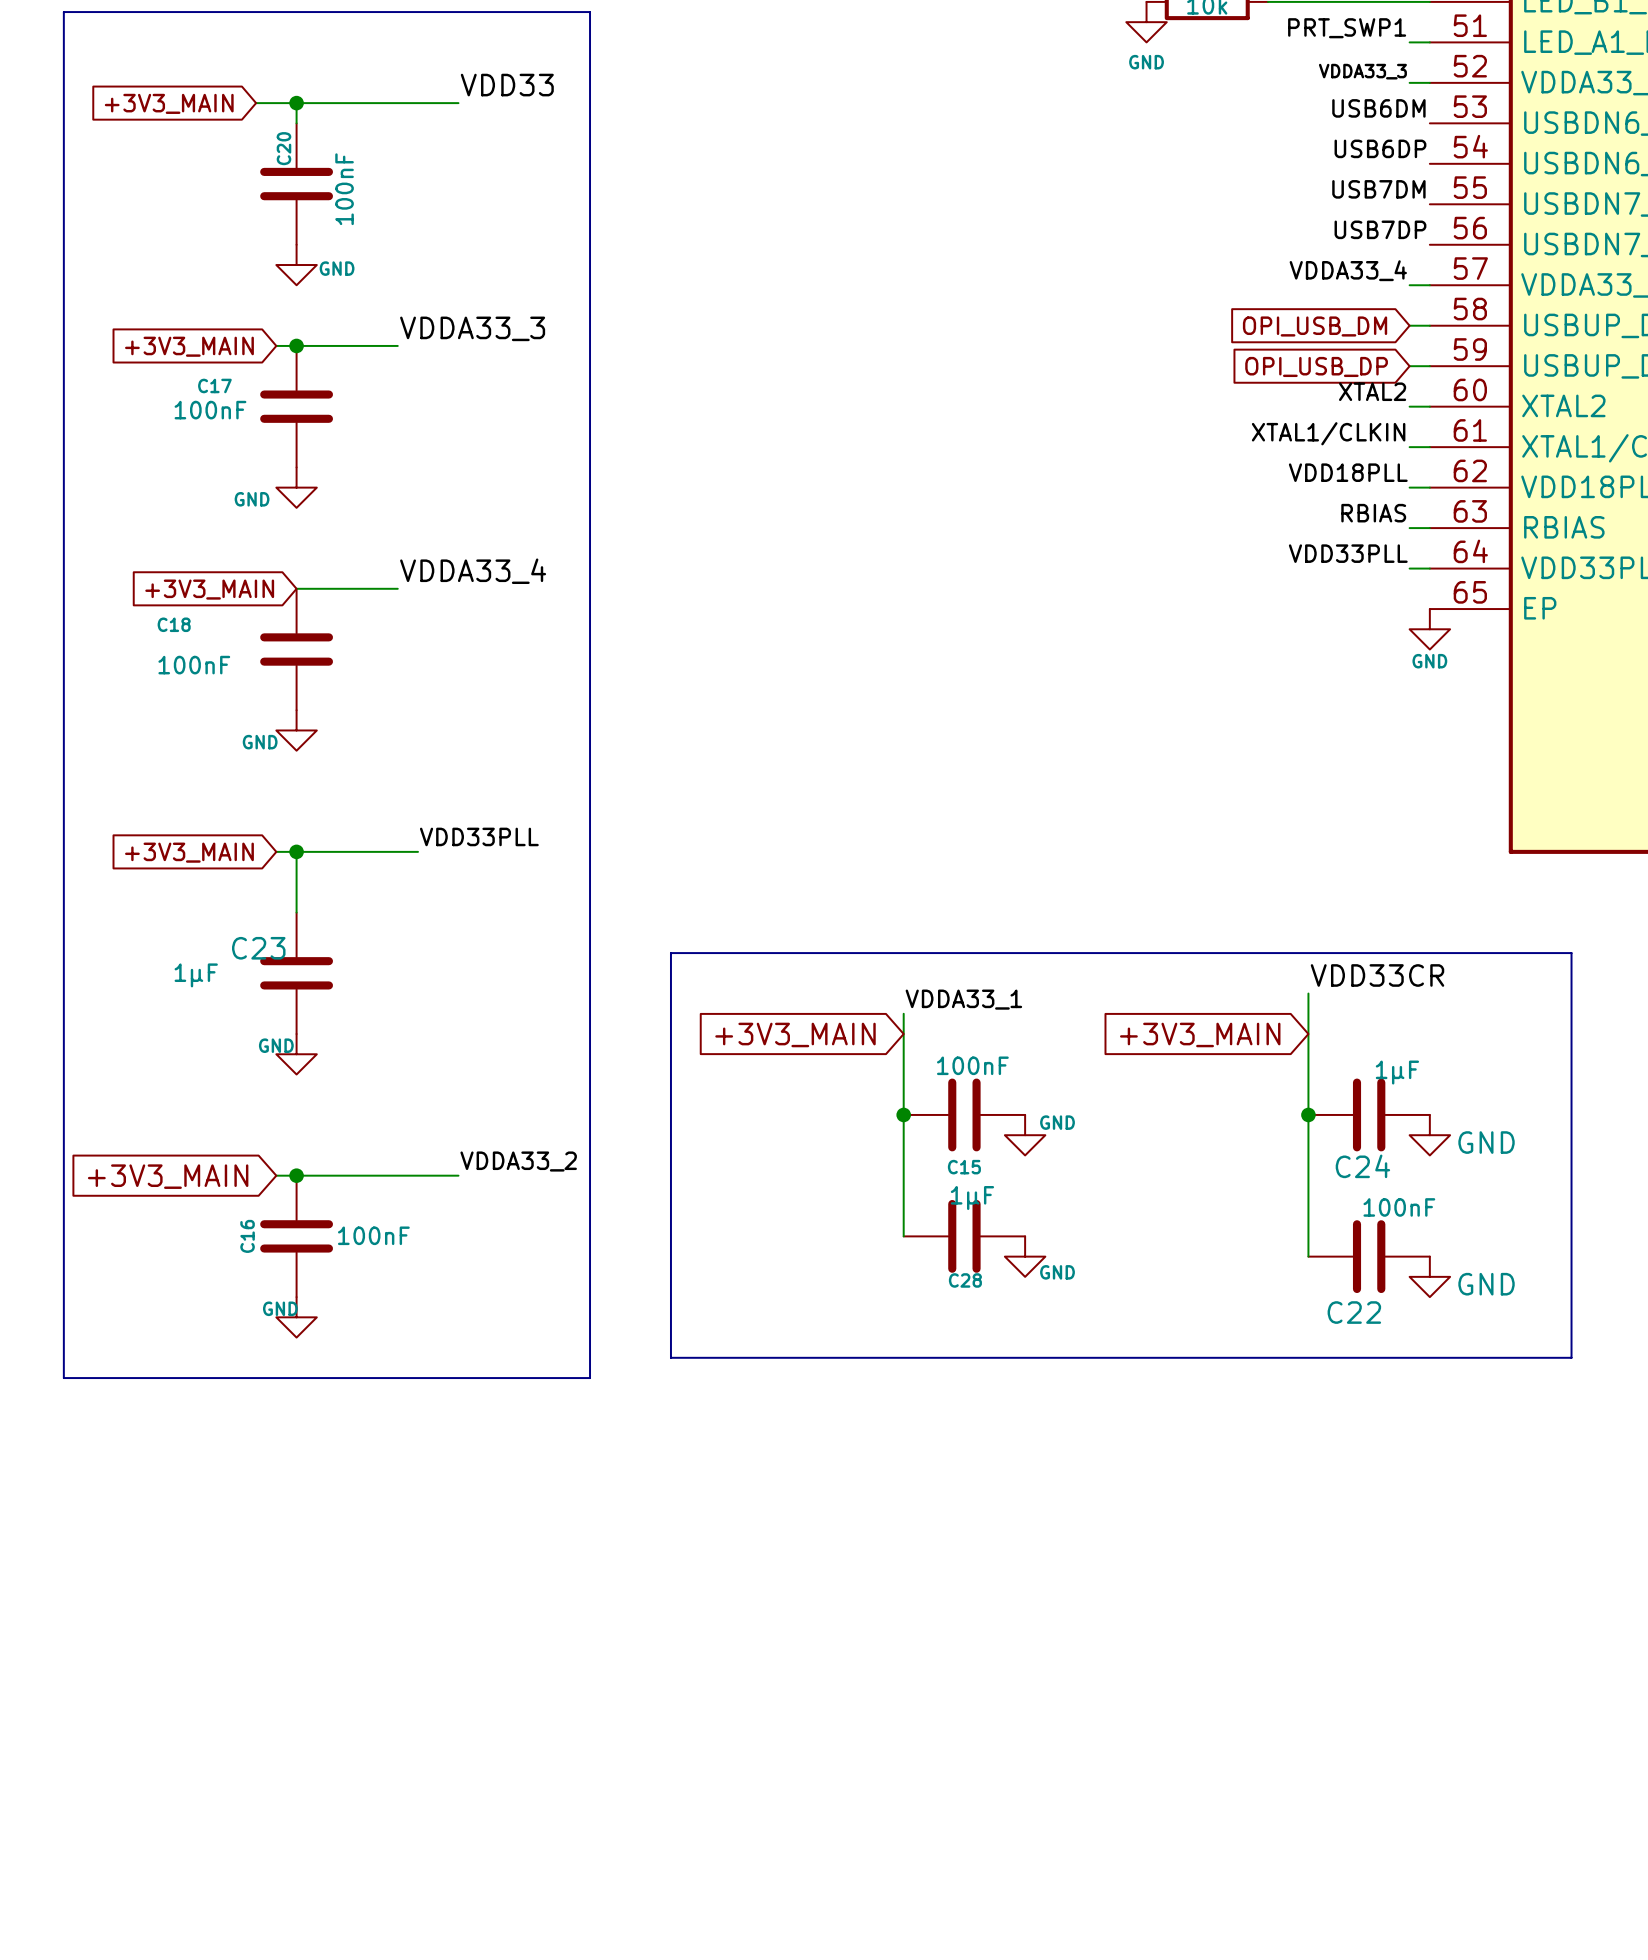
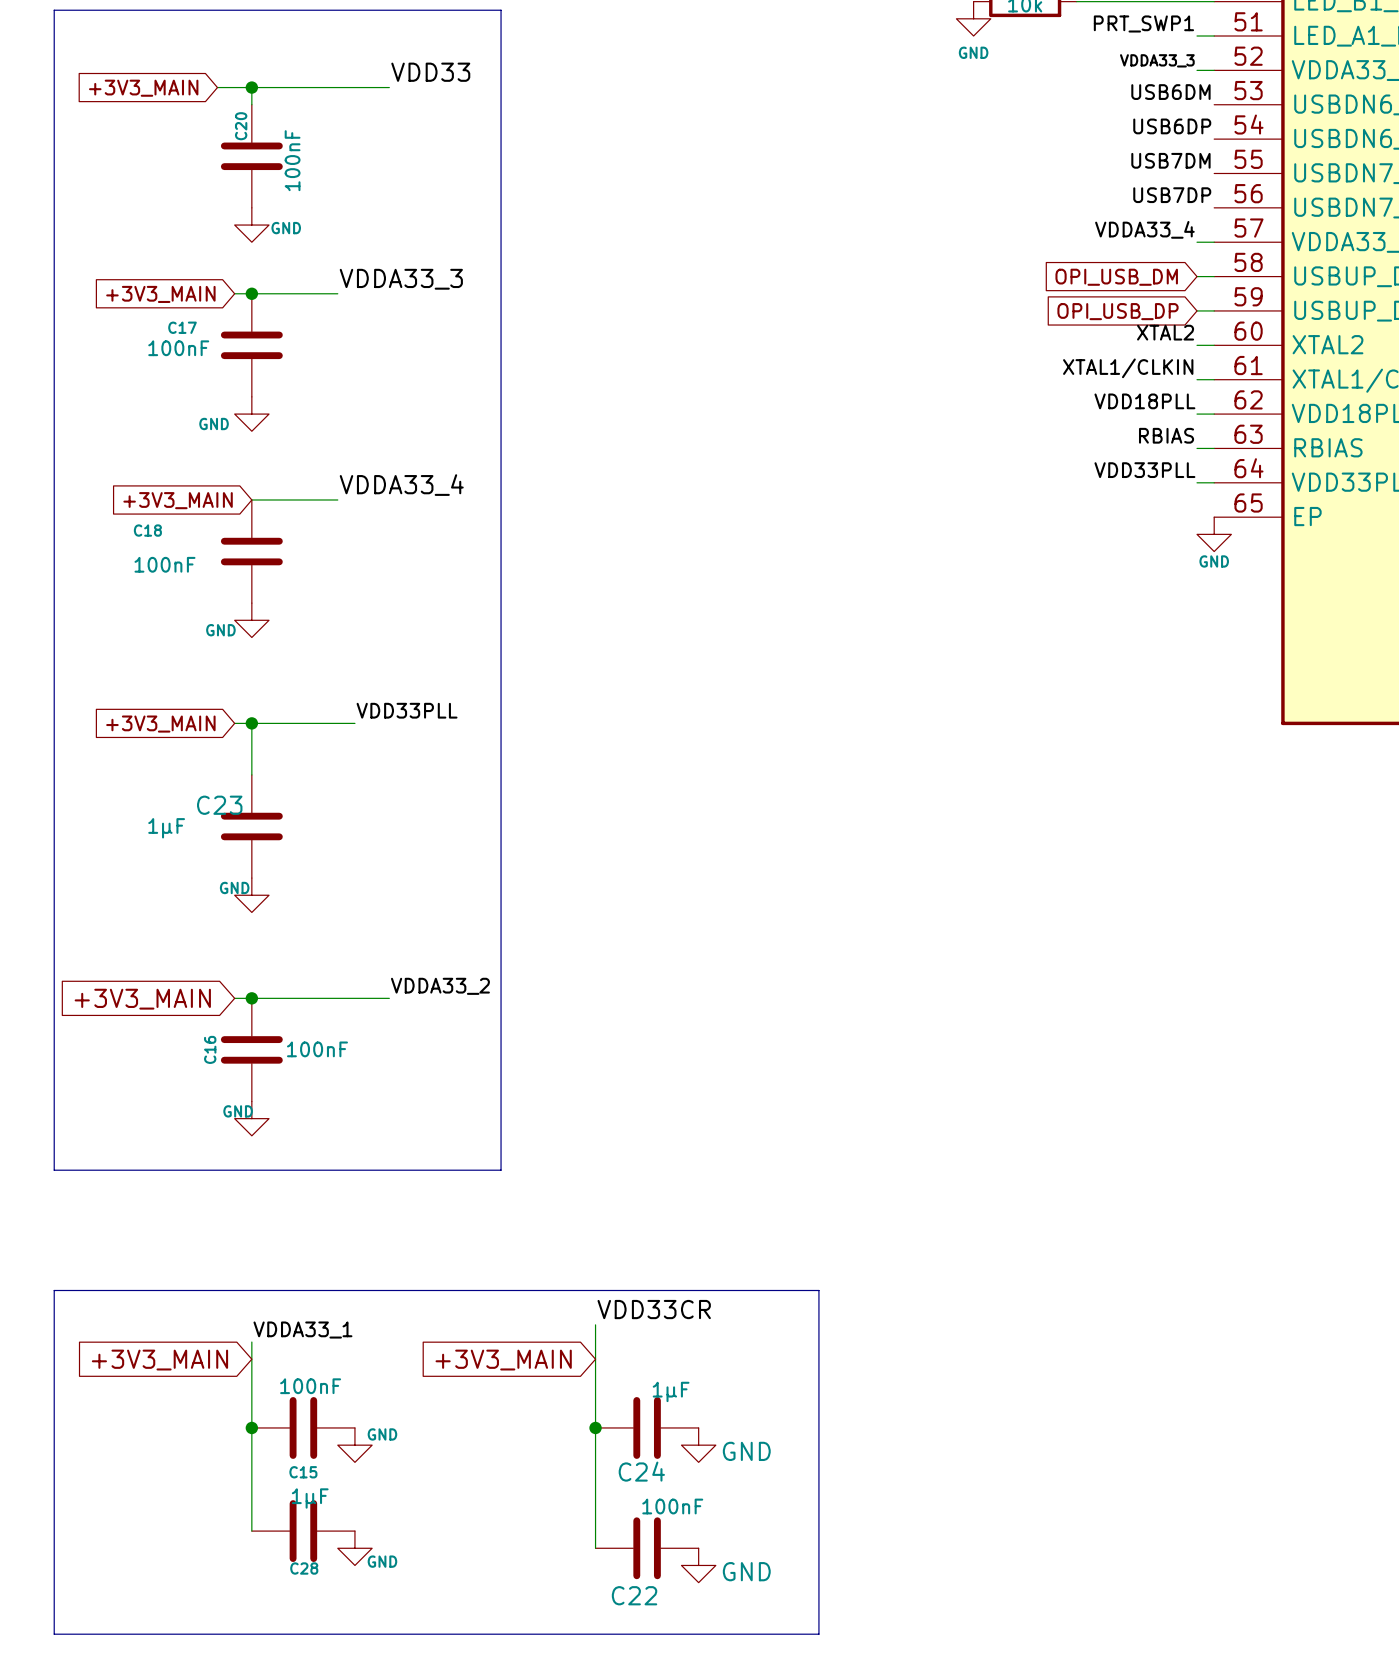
line: (670, 953) (1571, 953) (1571, 1357) (670, 1357) (670, 953) -> none
label: VDD33CR (1377, 975) -> none
wire: (1308, 993) (1308, 1256) -> none
label: VDDA33_1 (963, 999) -> none
wire: (903, 1013) (903, 1236) -> none
global label: +3V3_MAIN (795, 1034) -> none
global label: +3V3_MAIN (1200, 1034) -> none
junction: (903, 1114) -> none
C15 position: (964, 1114) -> (303, 1427)
junction: (1308, 1114) -> none
C24 position: (1369, 1114) -> (647, 1427)
power symbol: GND (1025, 1135) -> none
power symbol: GND (1429, 1135) -> none
C28 position: (964, 1236) -> (303, 1531)
power symbol: GND (1025, 1256) -> none
C22 position: (1369, 1256) -> (647, 1548)
power symbol: GND (1429, 1276) -> none
line: none -> (54, 1290) (54, 1634) (818, 1634) (818, 1290) (54, 1290)
label: none -> VDD33CR (654, 1309)
wire: none -> (595, 1324) (595, 1548)
label: none -> VDDA33_1 (302, 1330)
wire: none -> (251, 1342) (251, 1531)
global label: none -> +3V3_MAIN (159, 1360)
global label: none -> +3V3_MAIN (503, 1360)
junction: none -> (251, 1427)
junction: none -> (595, 1427)
power symbol: none -> GND (354, 1445)
power symbol: none -> GND (698, 1445)
power symbol: none -> GND (354, 1548)
power symbol: none -> GND (698, 1565)

